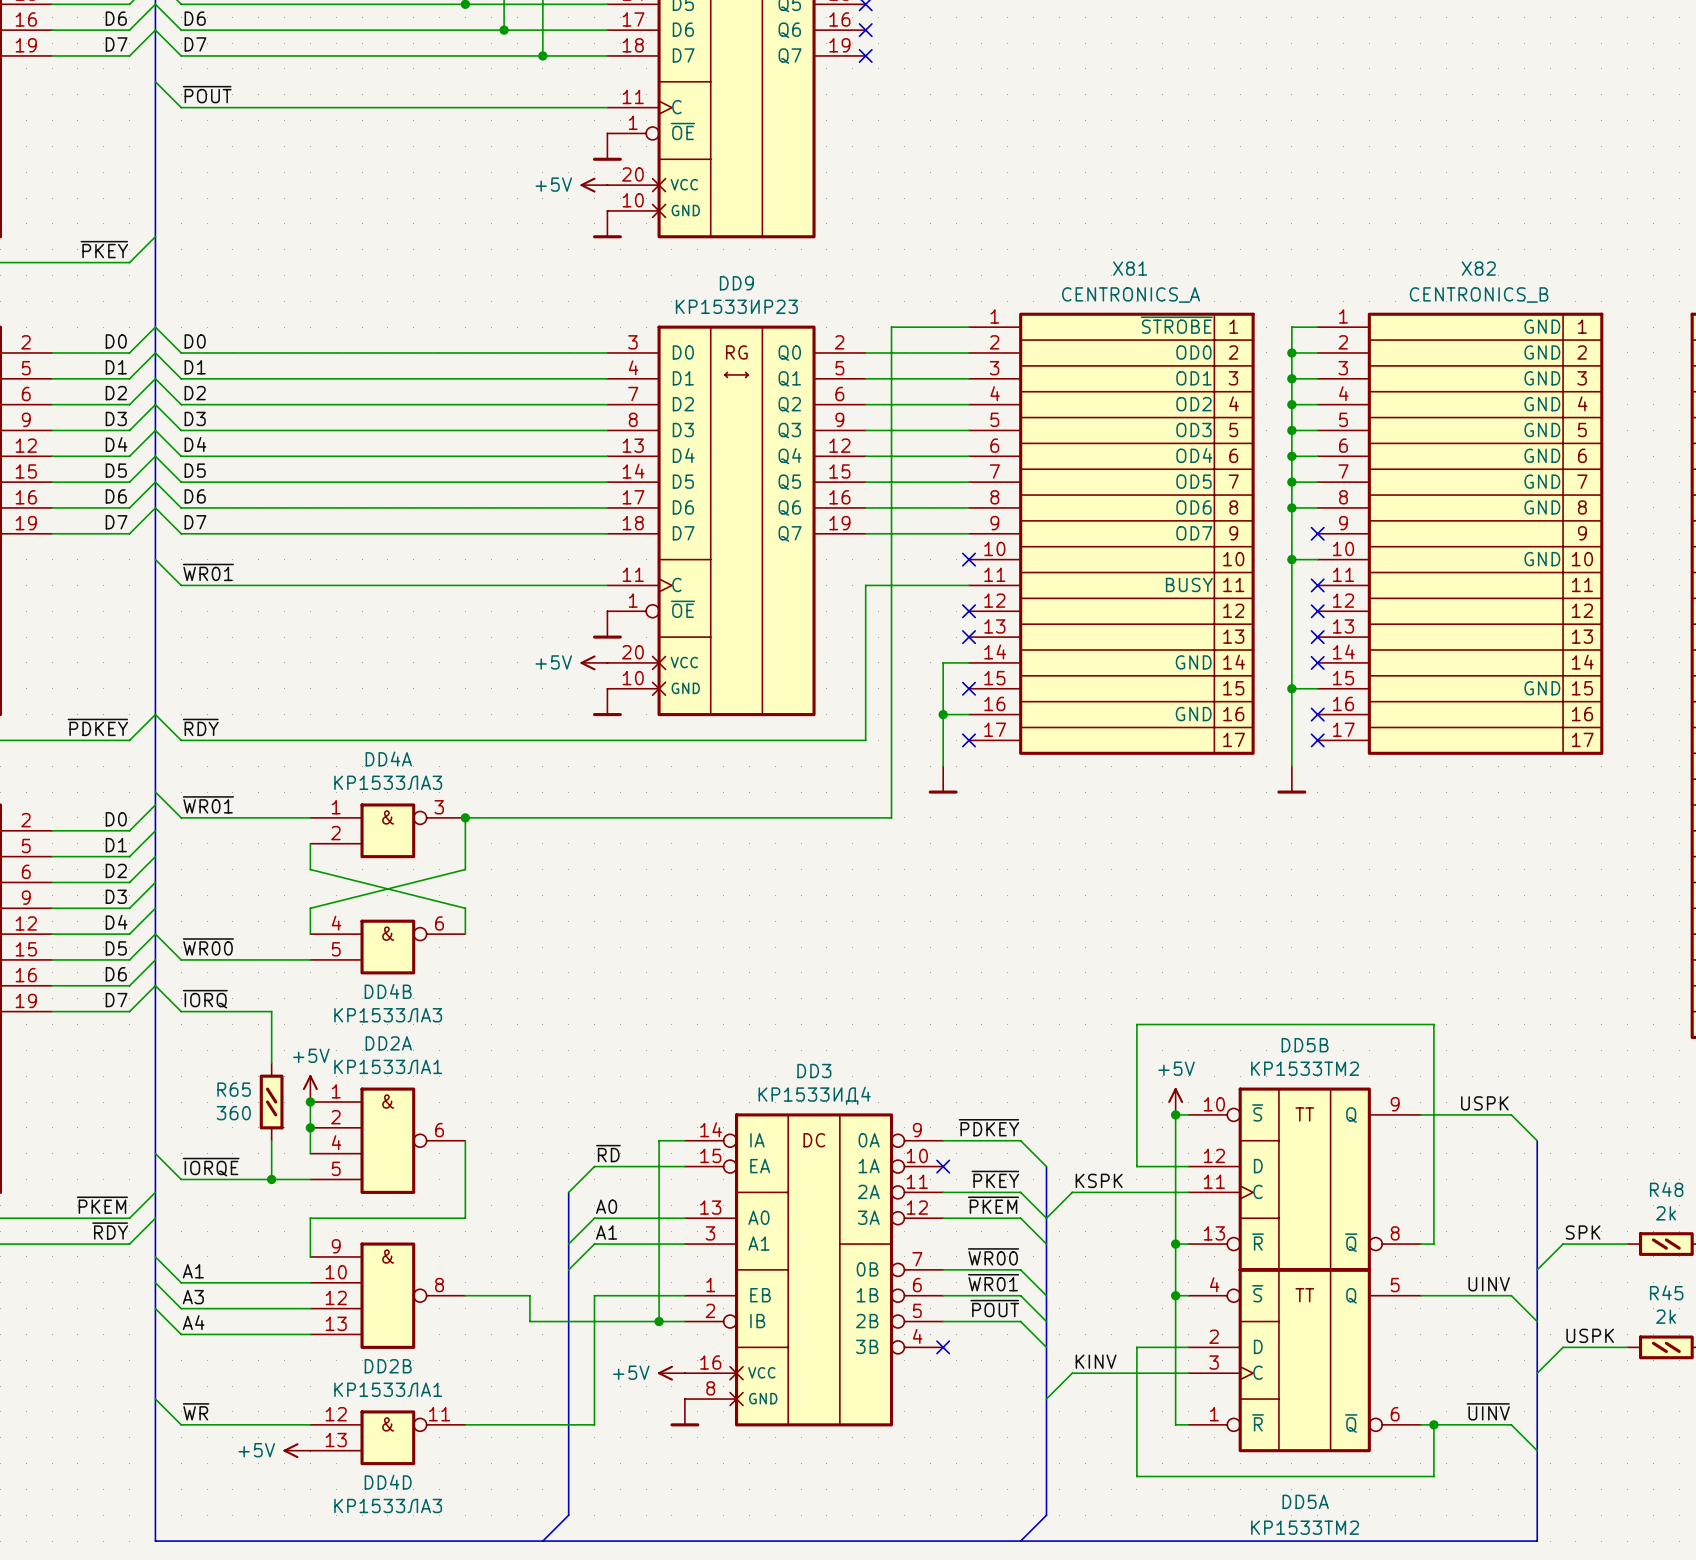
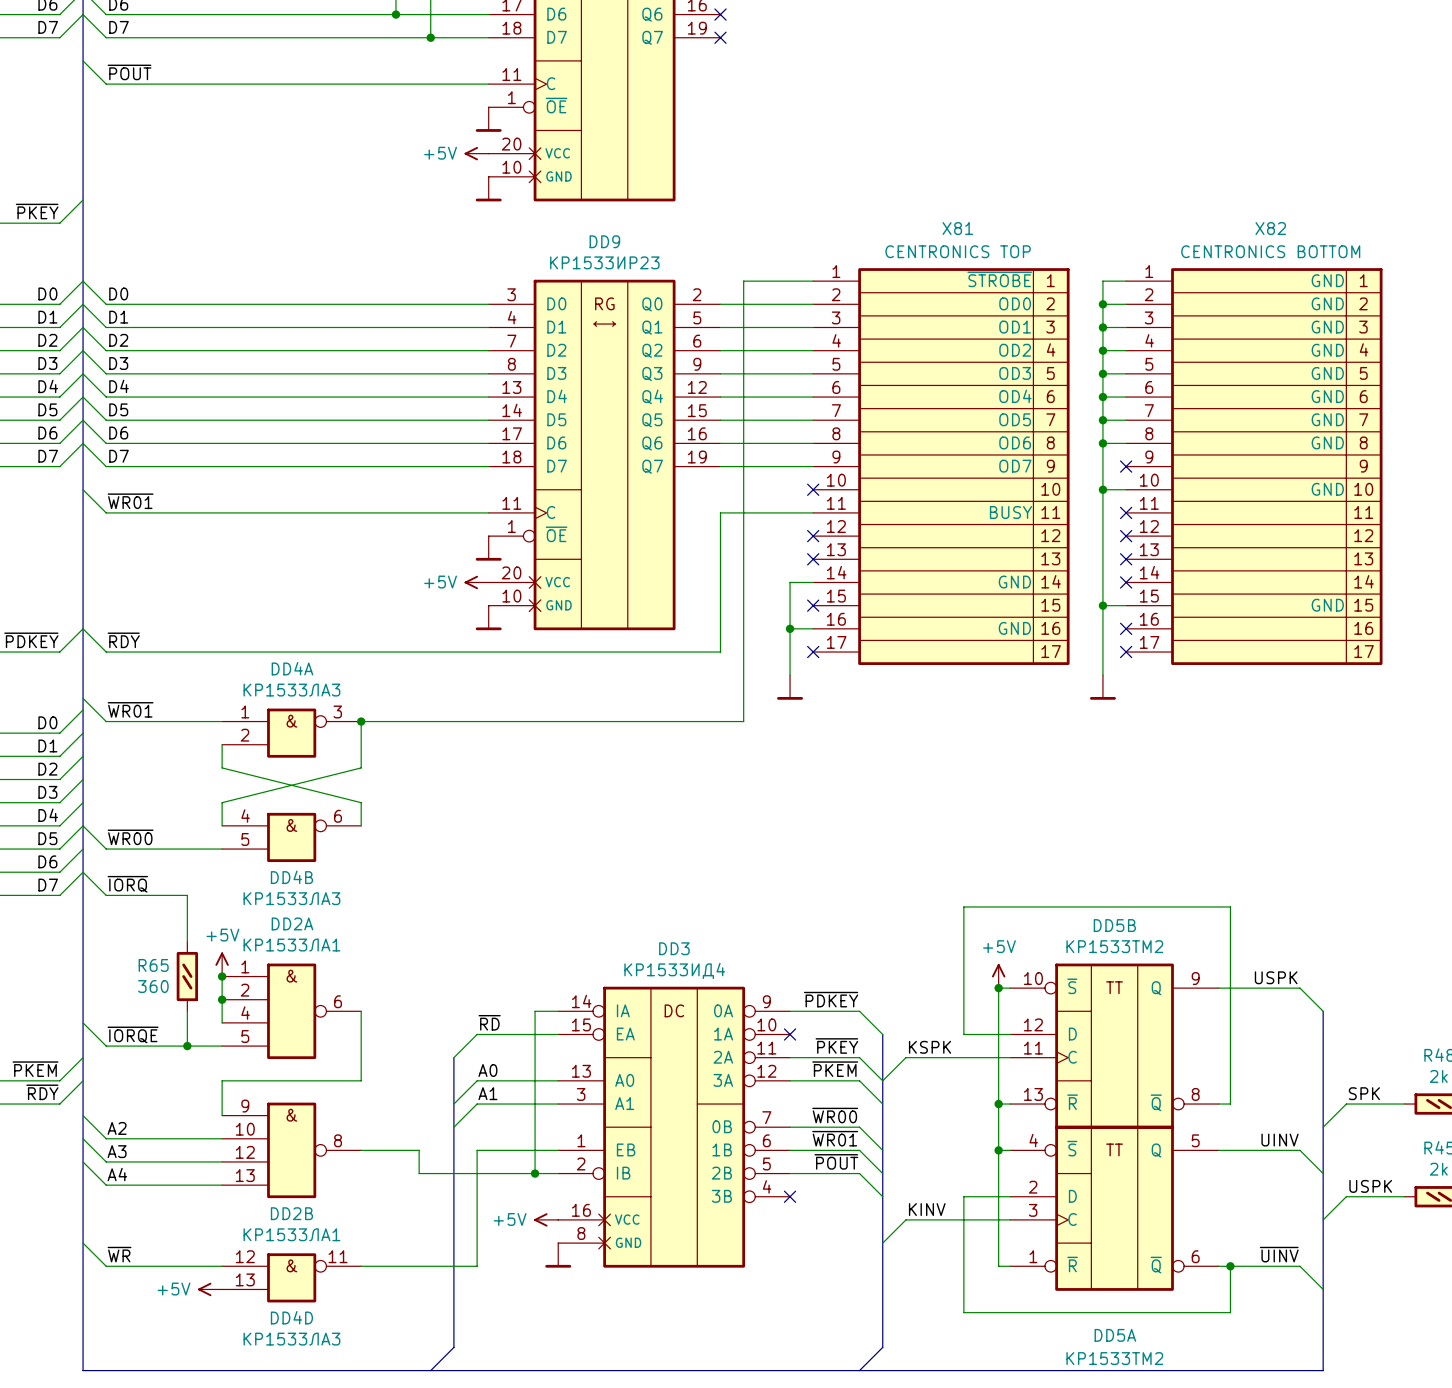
X81 value: CENTRONICS_A (1131, 295) -> CENTRONICS TOP (958, 251)
X82 value: CENTRONICS_B (1479, 295) -> CENTRONICS BOTTOM (1270, 251)
label: A1 (193, 1271) -> A2 (117, 1128)

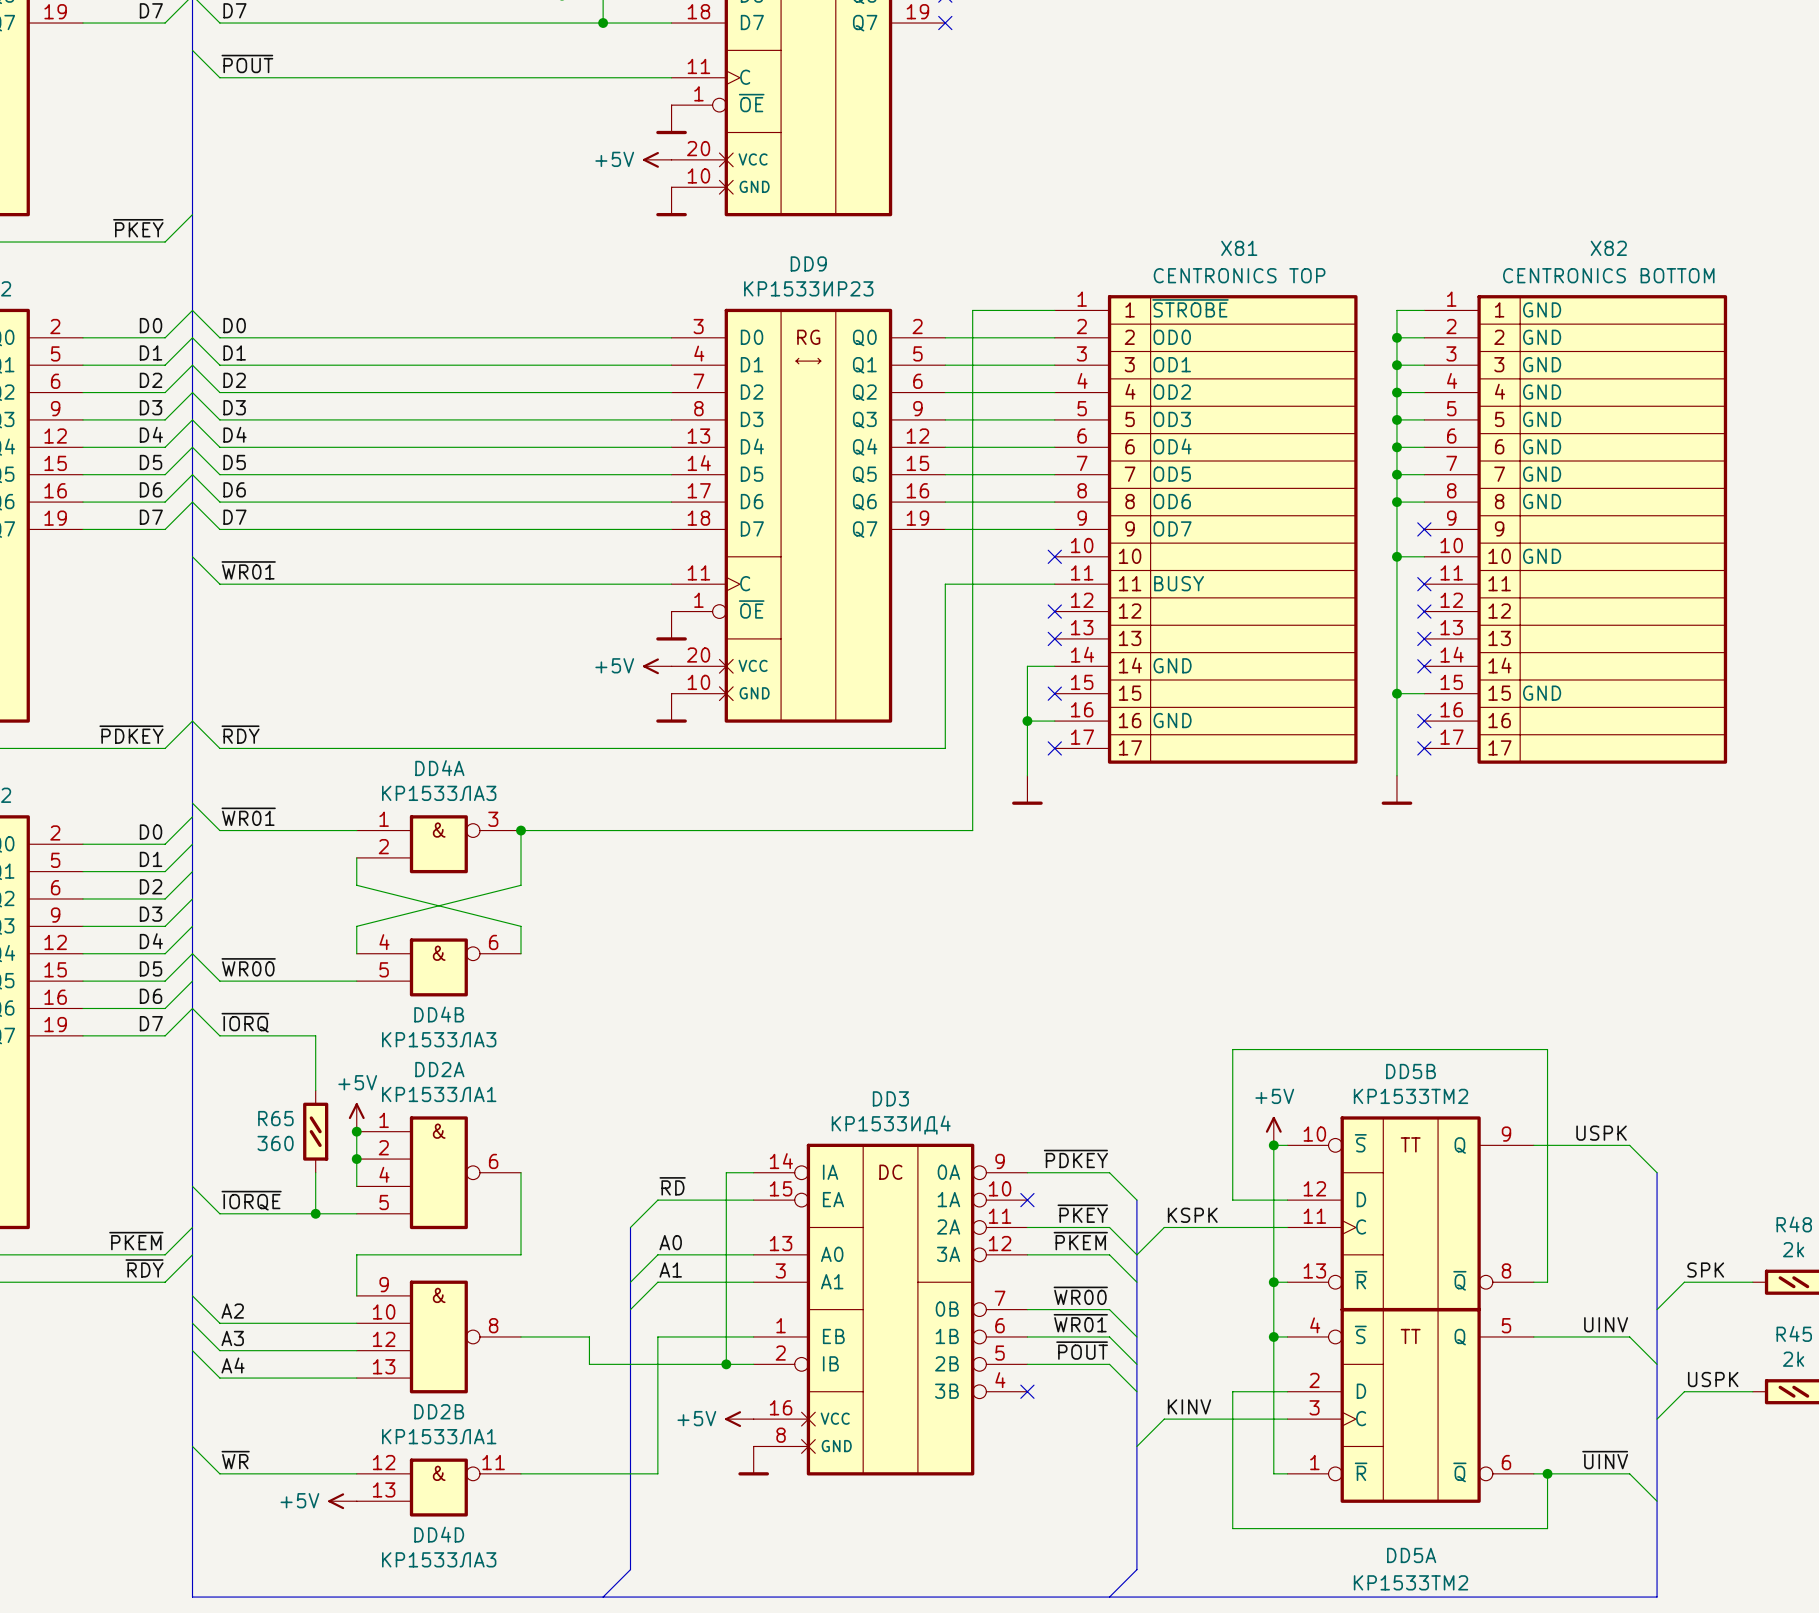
X81 symbol: [813, 268, 1070, 665] -> [1054, 295, 1358, 764]
X82 symbol: [1126, 268, 1383, 665] -> [1424, 295, 1728, 764]
X81 text position: ~{STROBE} (999, 279) -> ~{STROBE} (1190, 308)
X82 text position: GND (1327, 280) -> GND (1542, 309)
X81 text position: OD0 (1015, 303) -> OD0 (1172, 337)
X82 text position: GND (1327, 303) -> GND (1542, 337)
X81 text position: OD1 (1015, 327) -> OD1 (1172, 364)
X82 text position: GND (1327, 327) -> GND (1542, 364)
X81 text position: OD2 (1015, 350) -> OD2 (1172, 392)
X82 text position: GND (1327, 350) -> GND (1542, 392)
X81 text position: OD3 (1015, 373) -> OD3 (1172, 419)
X82 text position: GND (1327, 373) -> GND (1542, 419)
X81 text position: OD4 (1015, 396) -> OD4 (1172, 446)
X82 text position: GND (1327, 396) -> GND (1542, 446)
X81 text position: OD5 (1015, 419) -> OD5 (1172, 474)
X82 text position: GND (1327, 419) -> GND (1542, 474)
X81 text position: OD6 (1015, 442) -> OD6 (1172, 501)
X82 text position: GND (1327, 442) -> GND (1542, 501)
X81 text position: OD7 (1015, 466) -> OD7 (1172, 528)
X82 text position: GND (1327, 489) -> GND (1542, 556)
X81 text position: BUSY (1010, 512) -> BUSY (1179, 583)
X81 text position: GND (1014, 582) -> GND (1172, 665)
X82 text position: GND (1327, 605) -> GND (1542, 693)
X81 text position: GND (1014, 628) -> GND (1172, 720)

